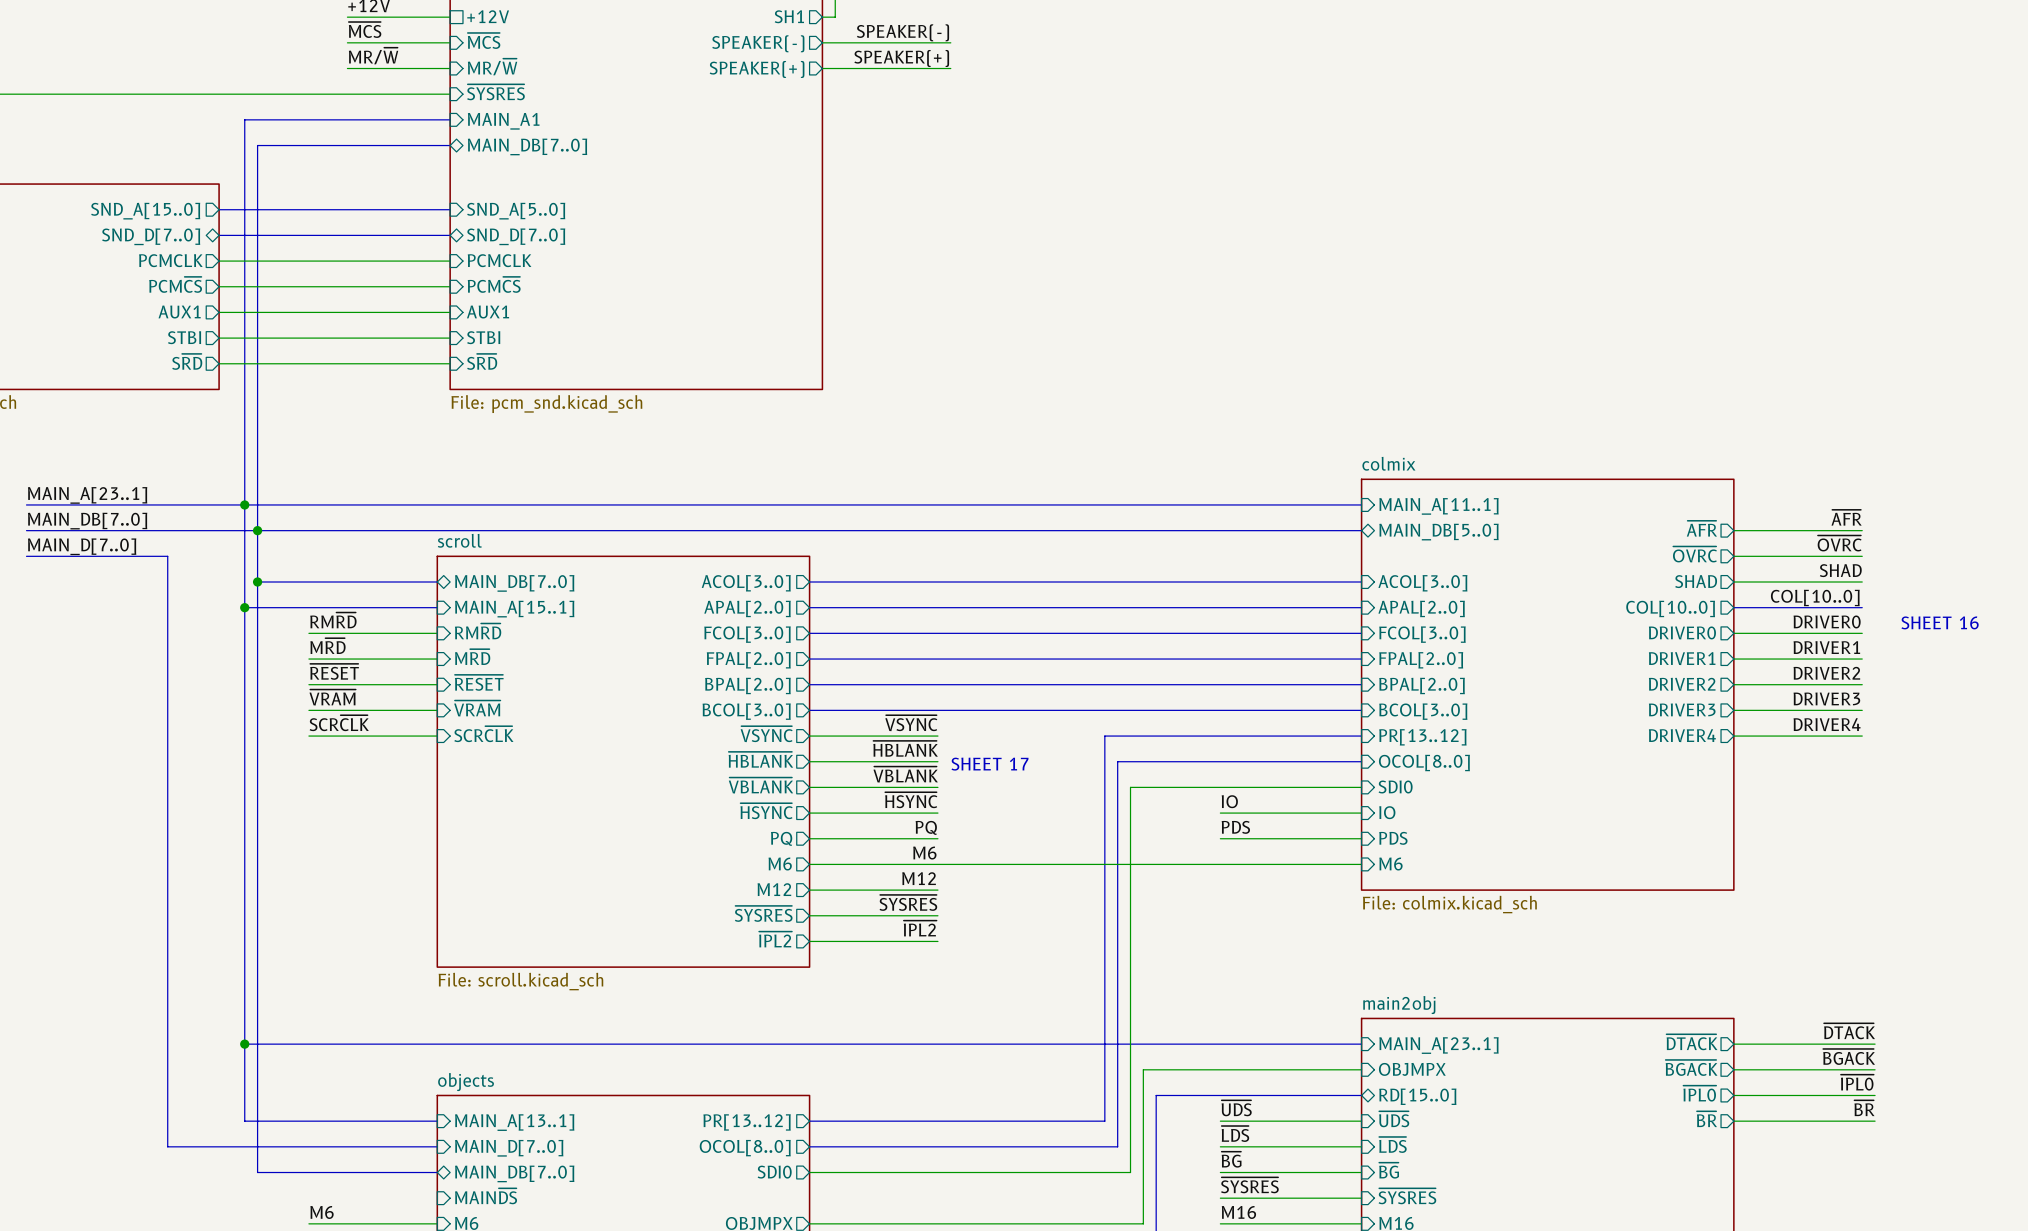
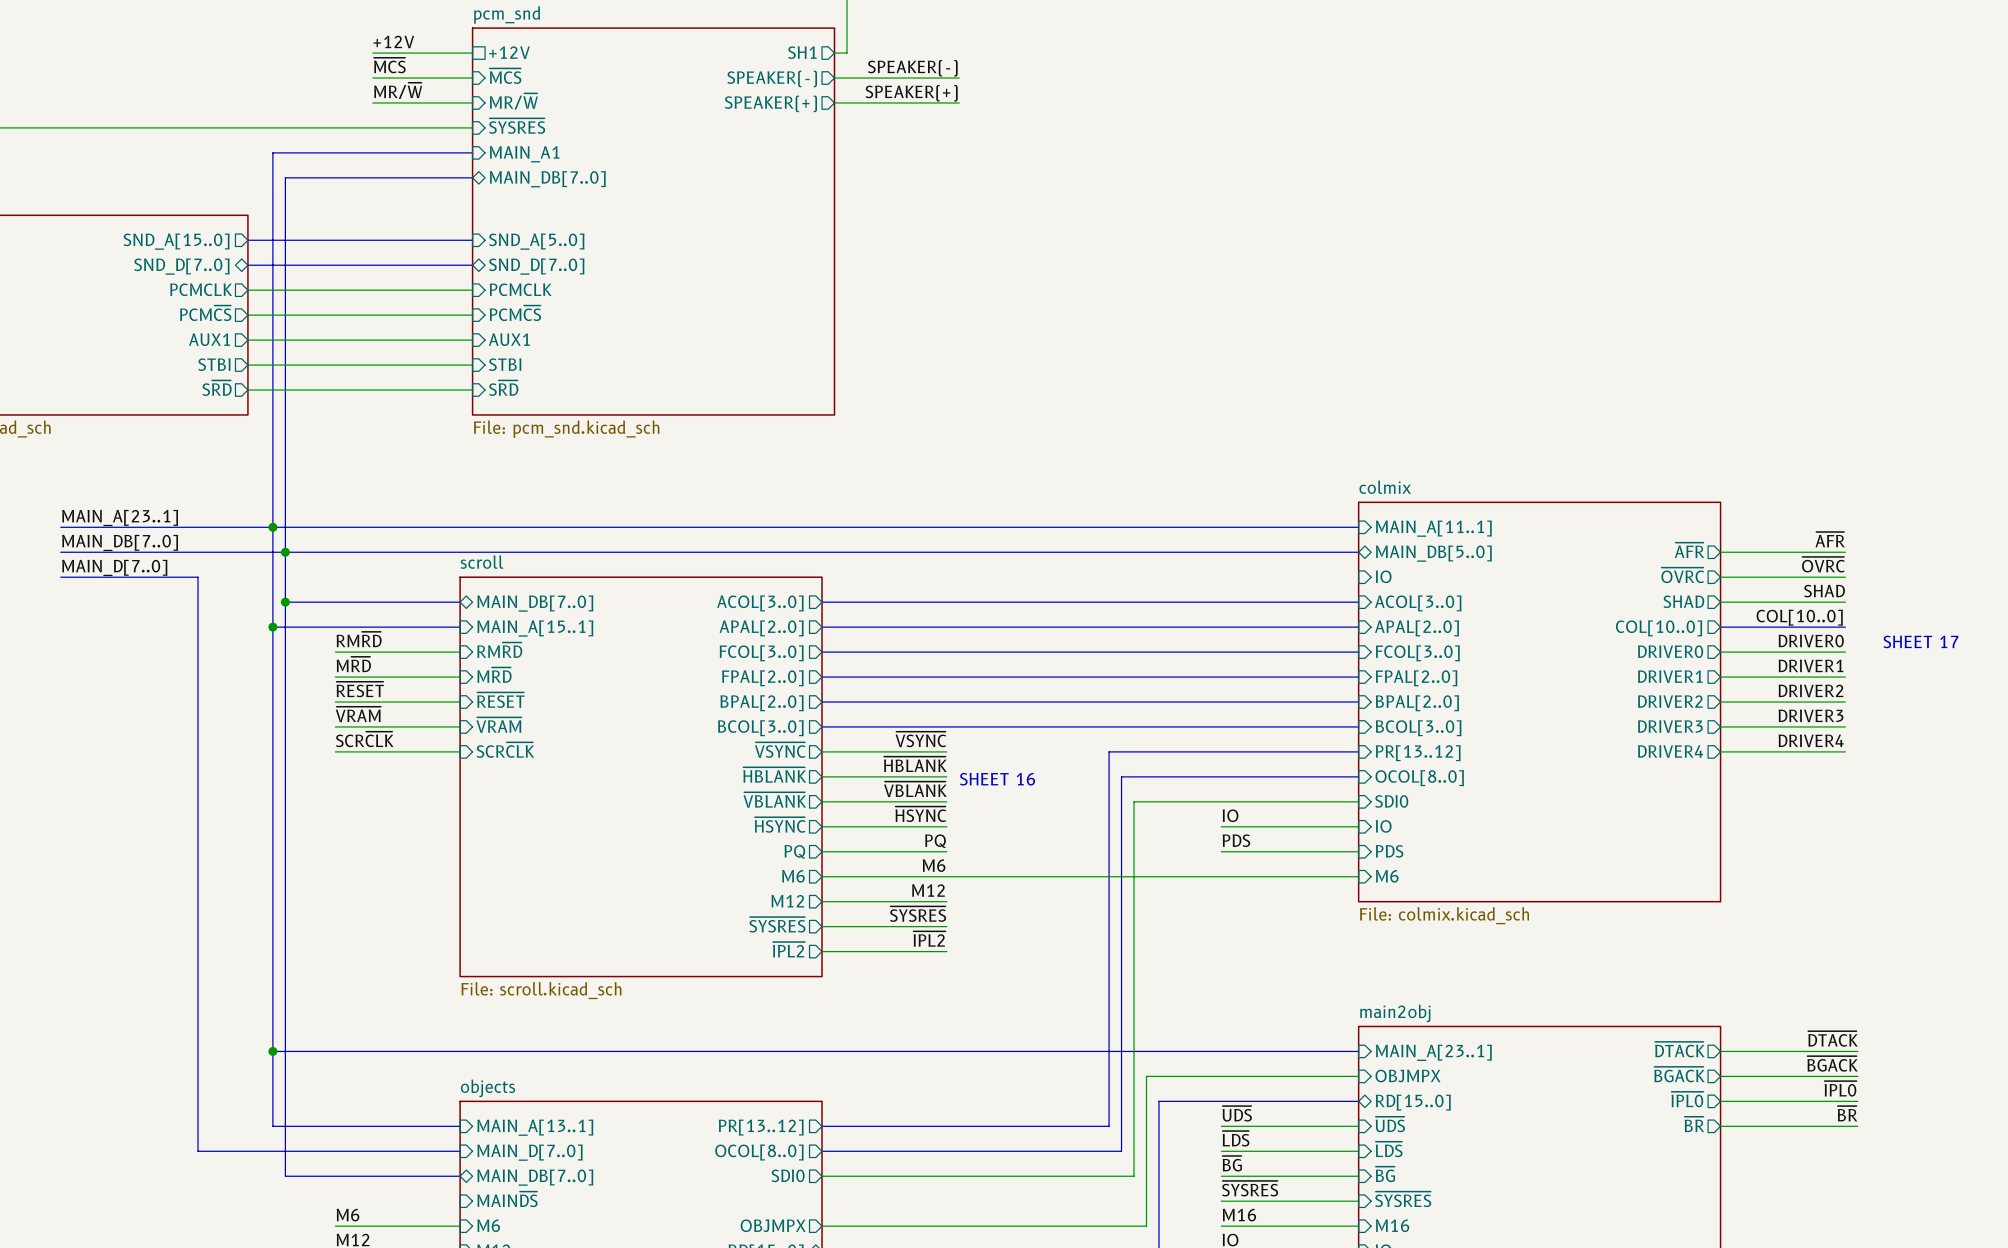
sheet pin: none -> IO (1383, 576)
text: SHEET 16 (1940, 622) -> SHEET 17 (1920, 641)
text: SHEET 17 (989, 764) -> SHEET 16 (997, 779)

